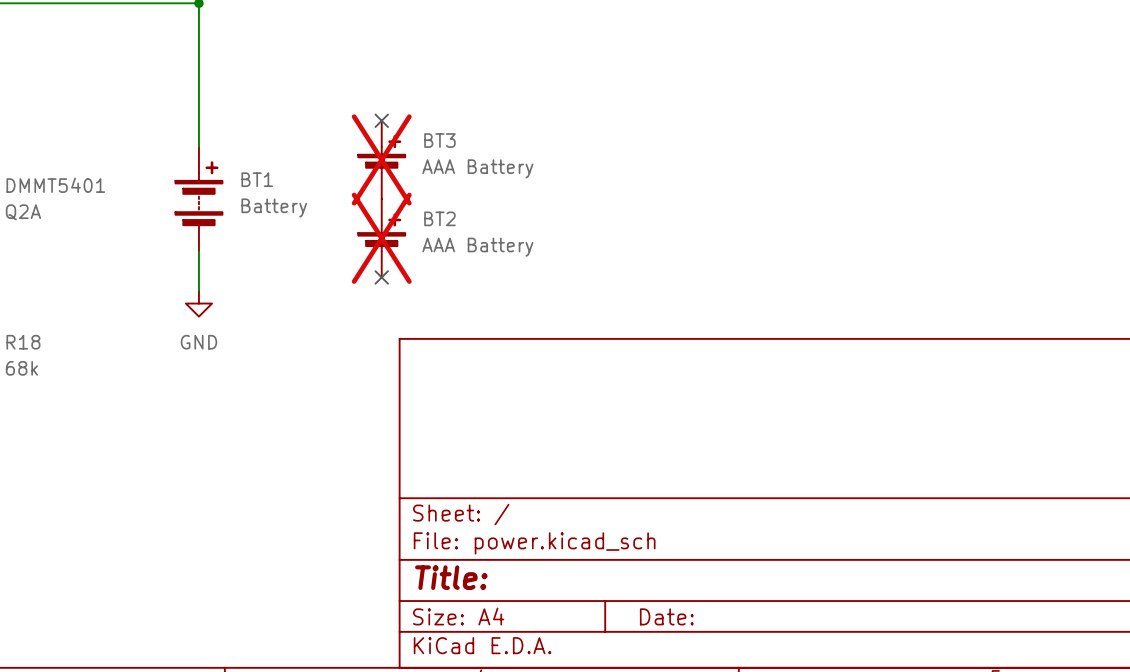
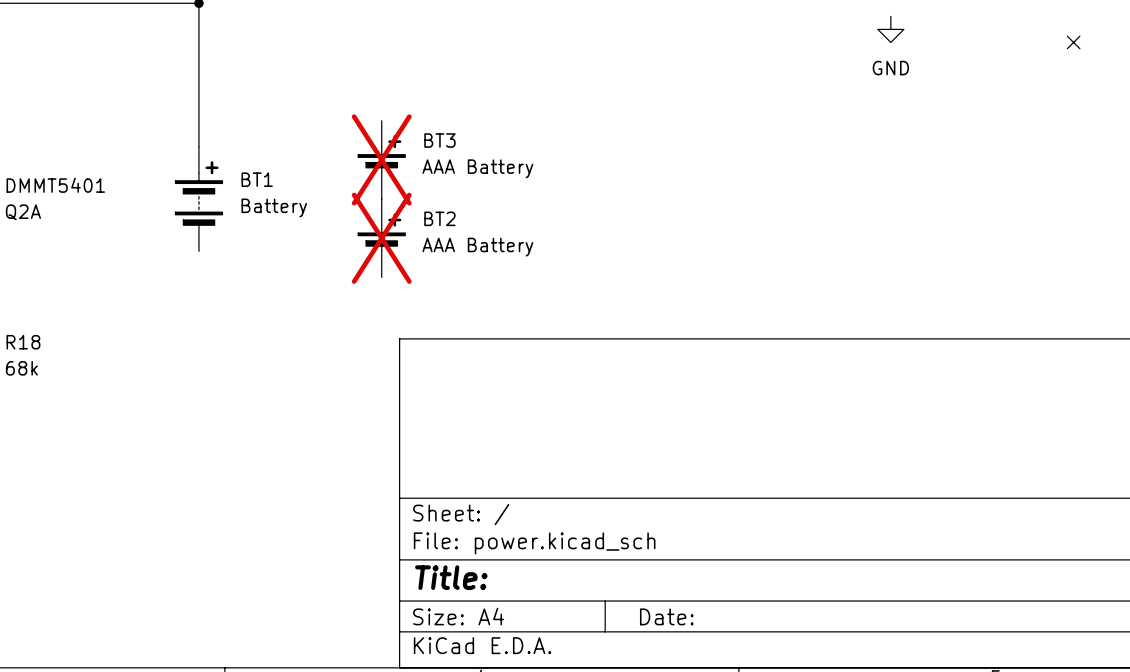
power symbol: none -> GND (890, 29)
no-connect mark: none -> (1073, 42)
no-connect mark: (381, 120) -> none
wire: (198, 251) (198, 290) -> none
no-connect mark: (381, 277) -> none
power symbol: GND (198, 303) -> none

